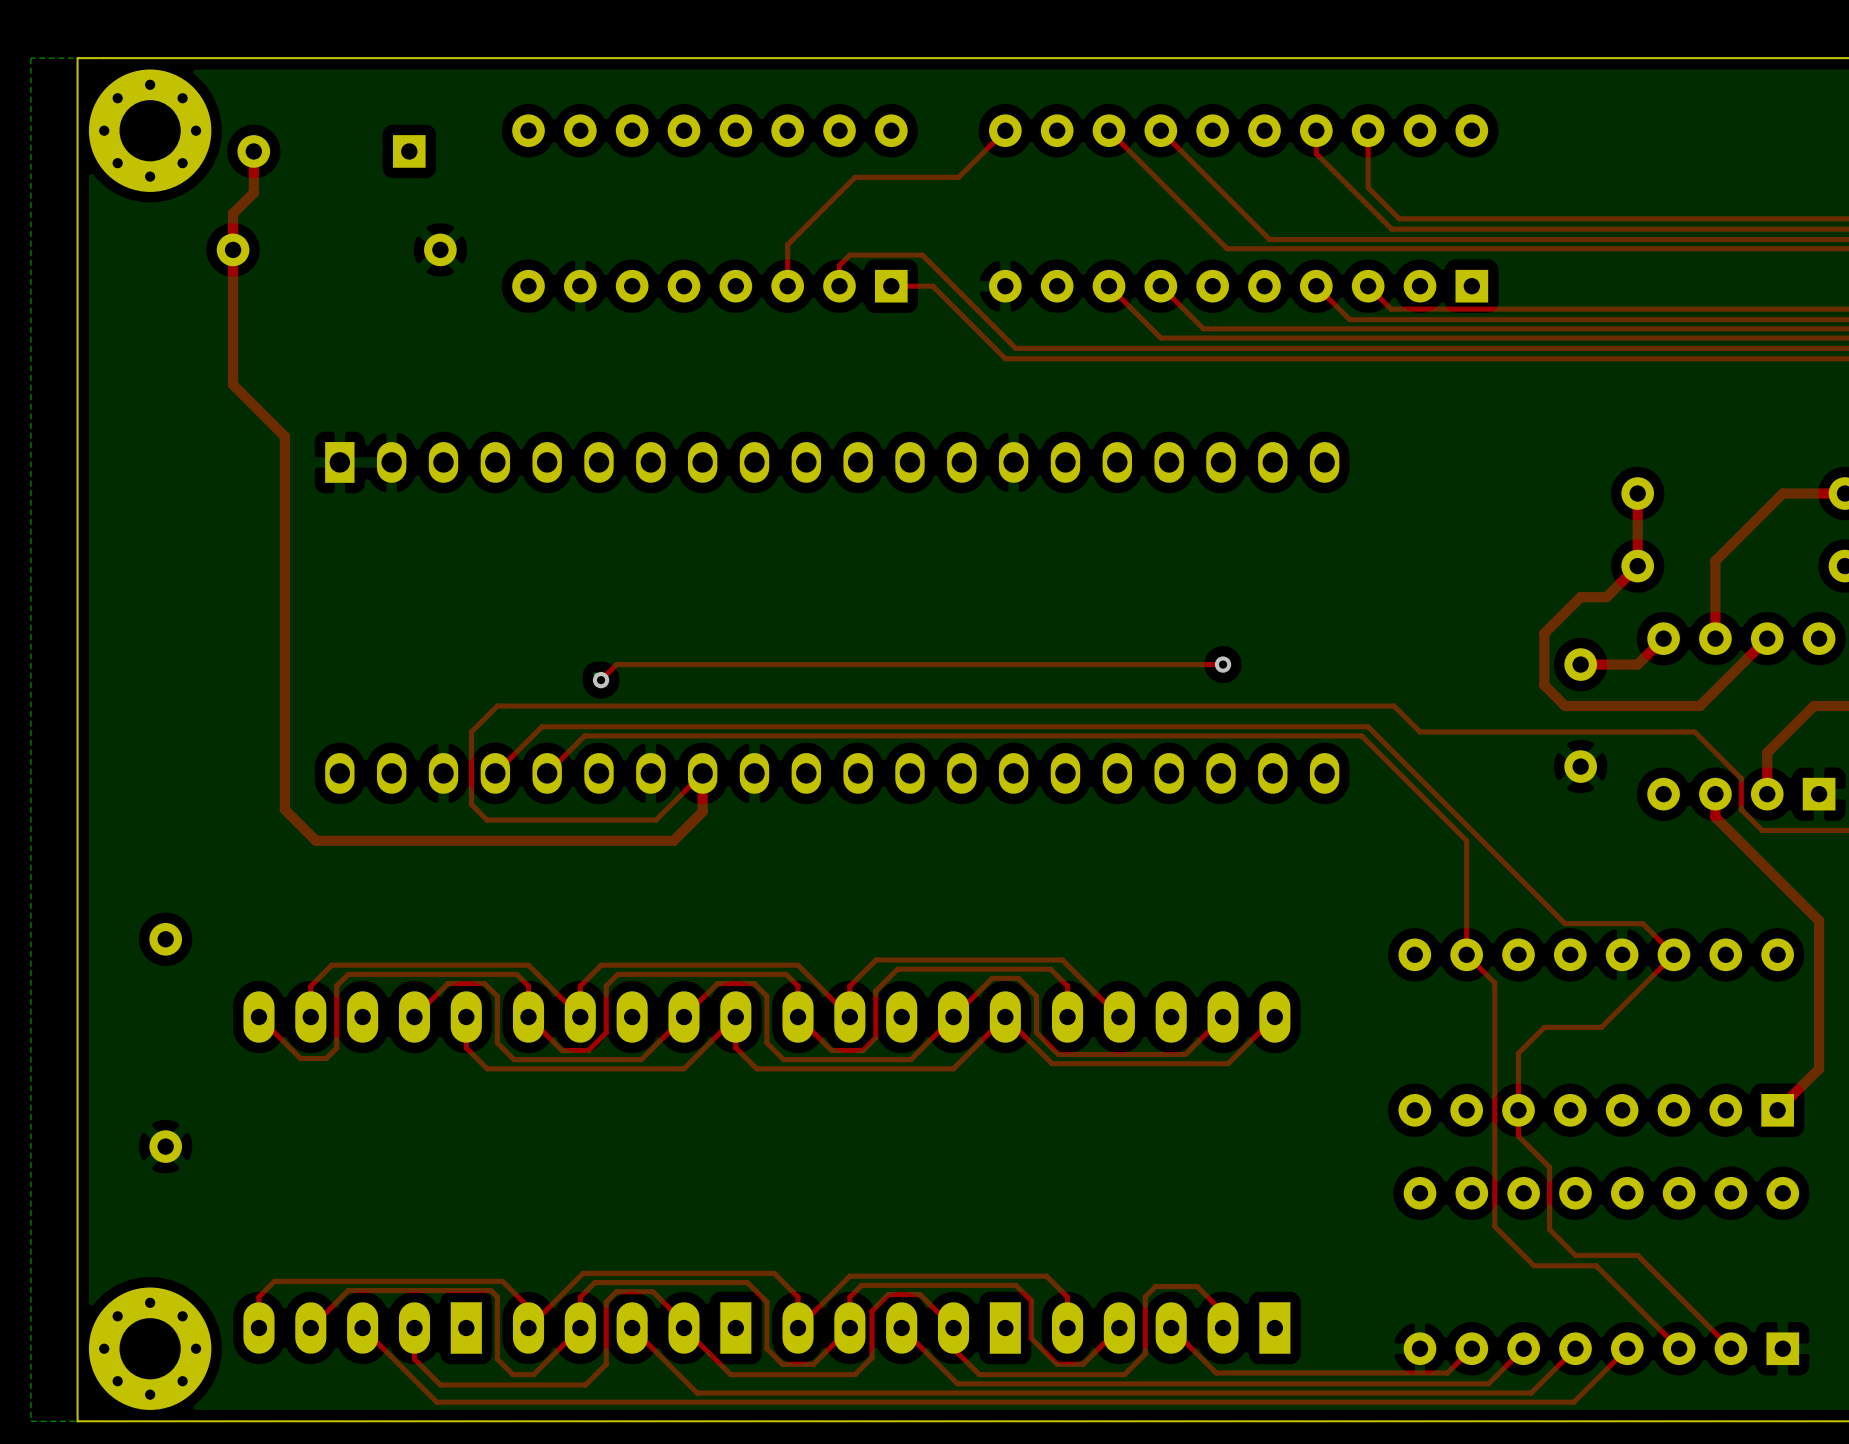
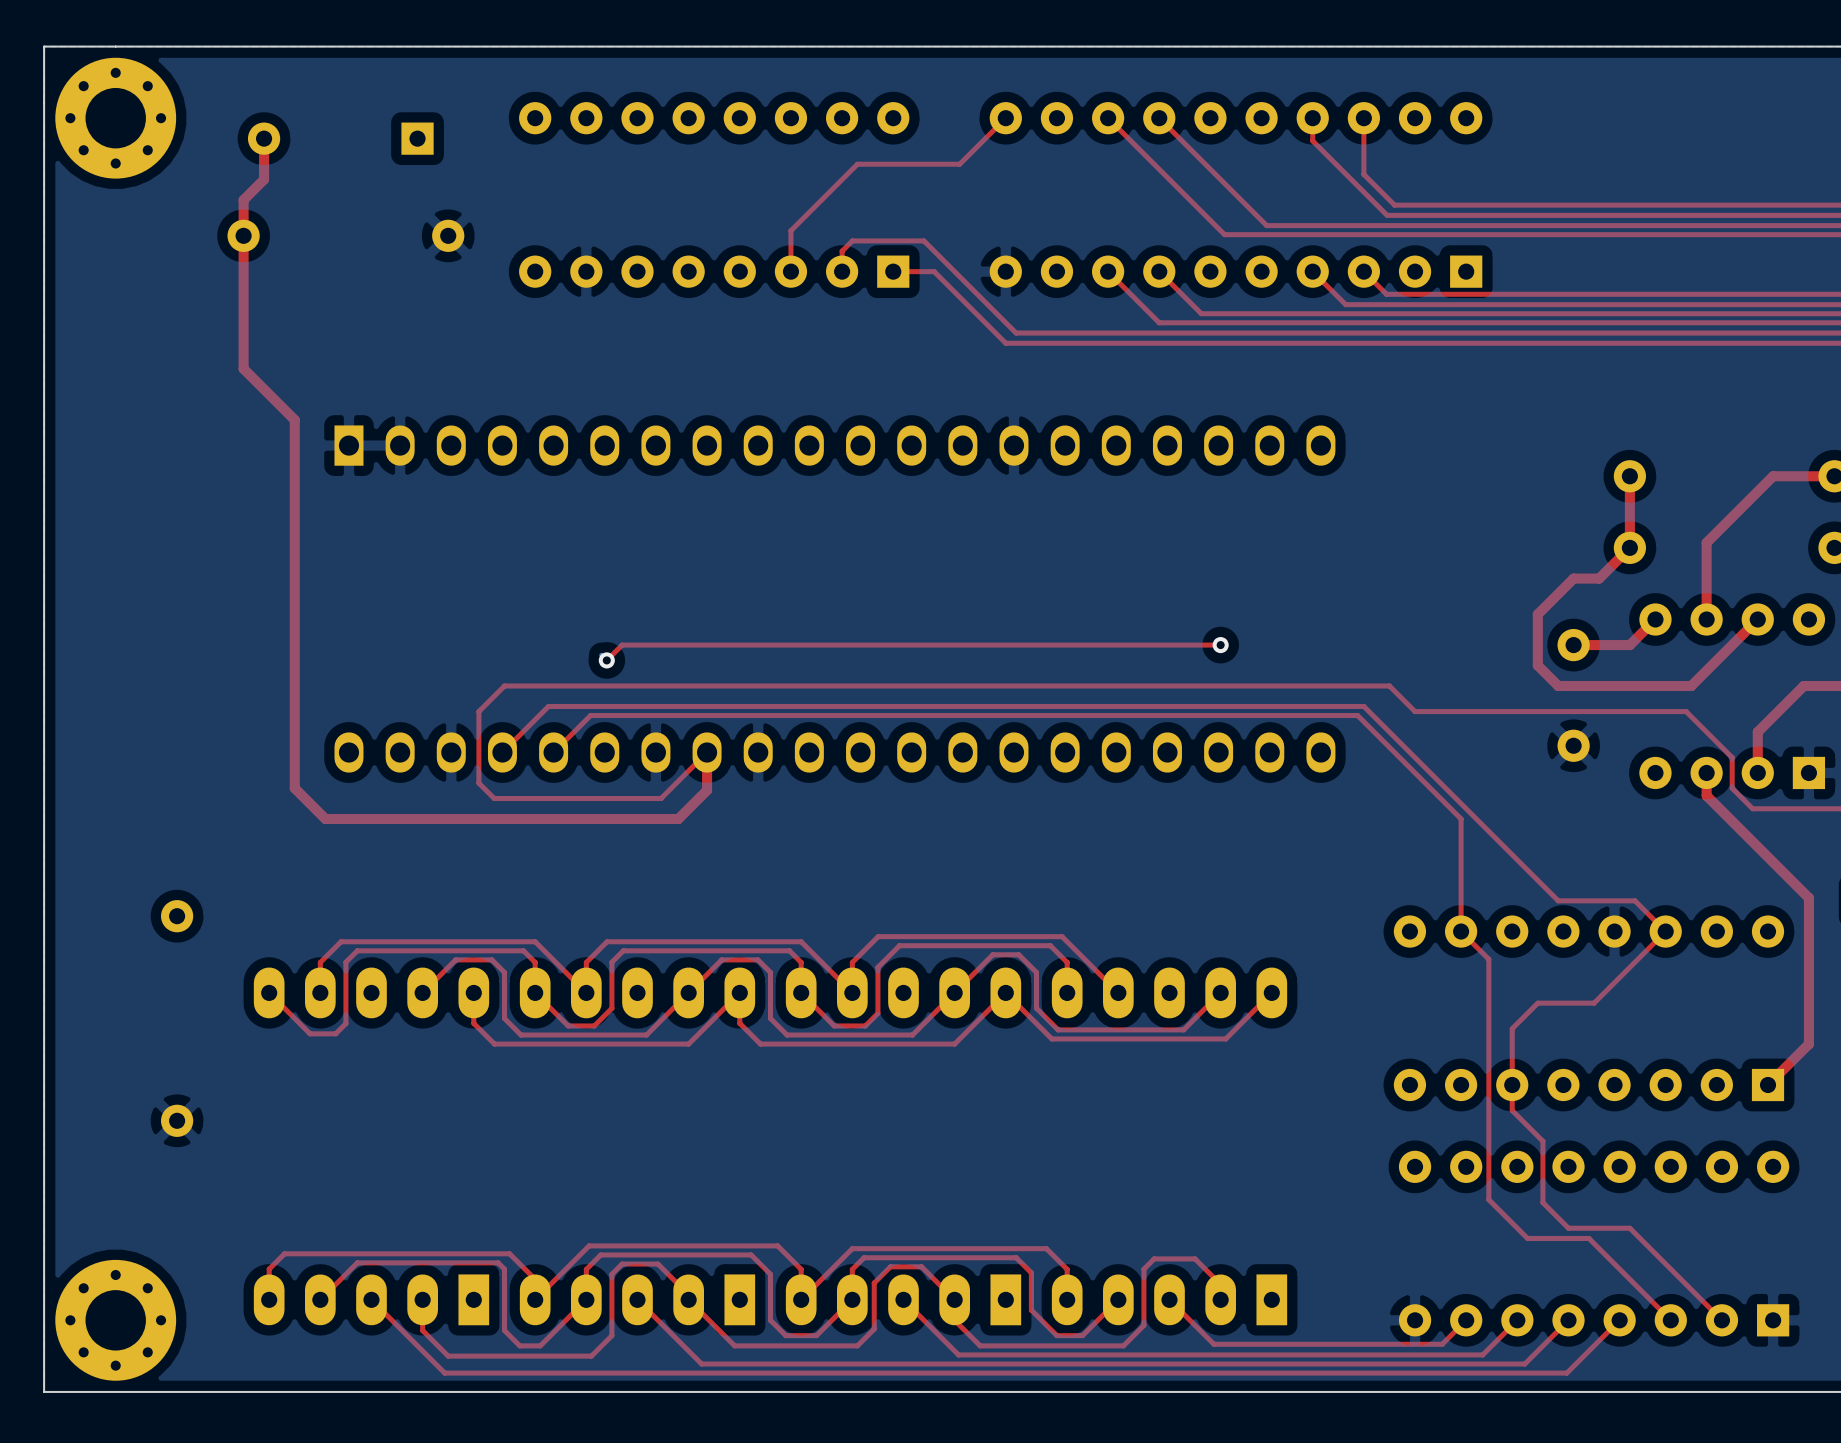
board edge: (77, 58) (77, 1421) -> (90, 46) (44, 46) (44, 1391) (90, 1391)
part position: (150, 130) -> (115, 118)
part position: (150, 1348) -> (115, 1320)

